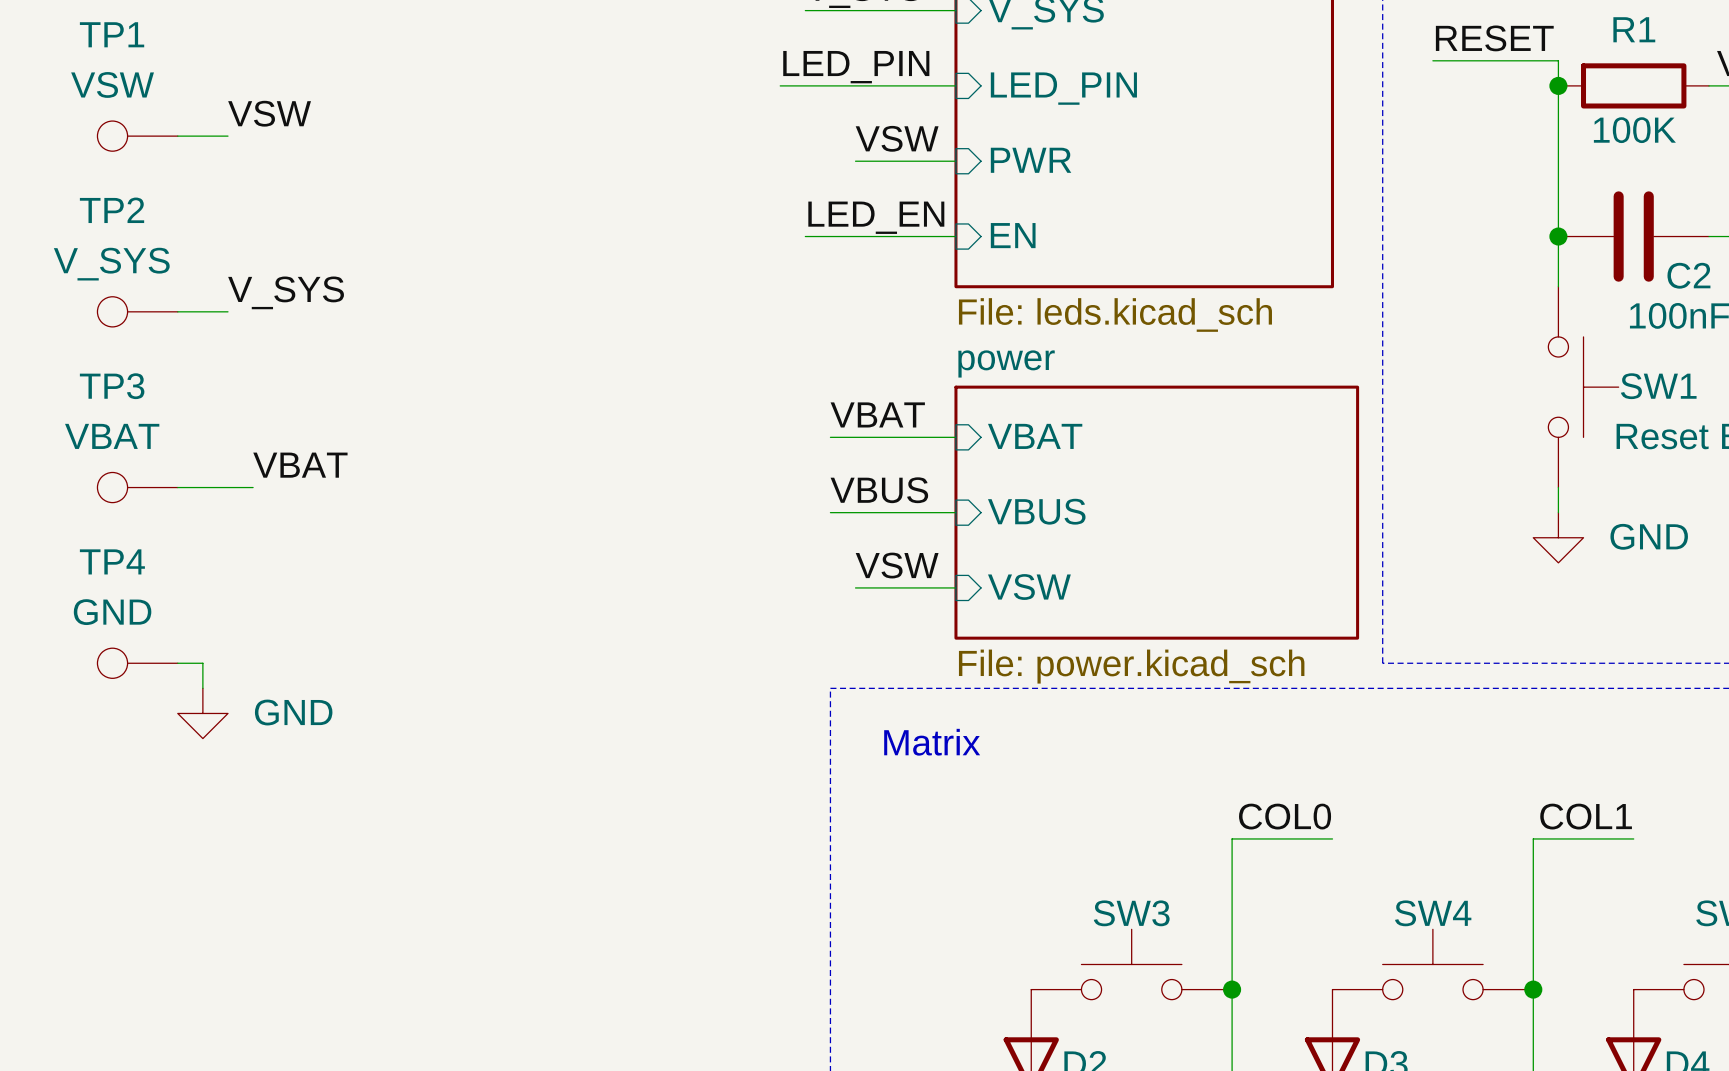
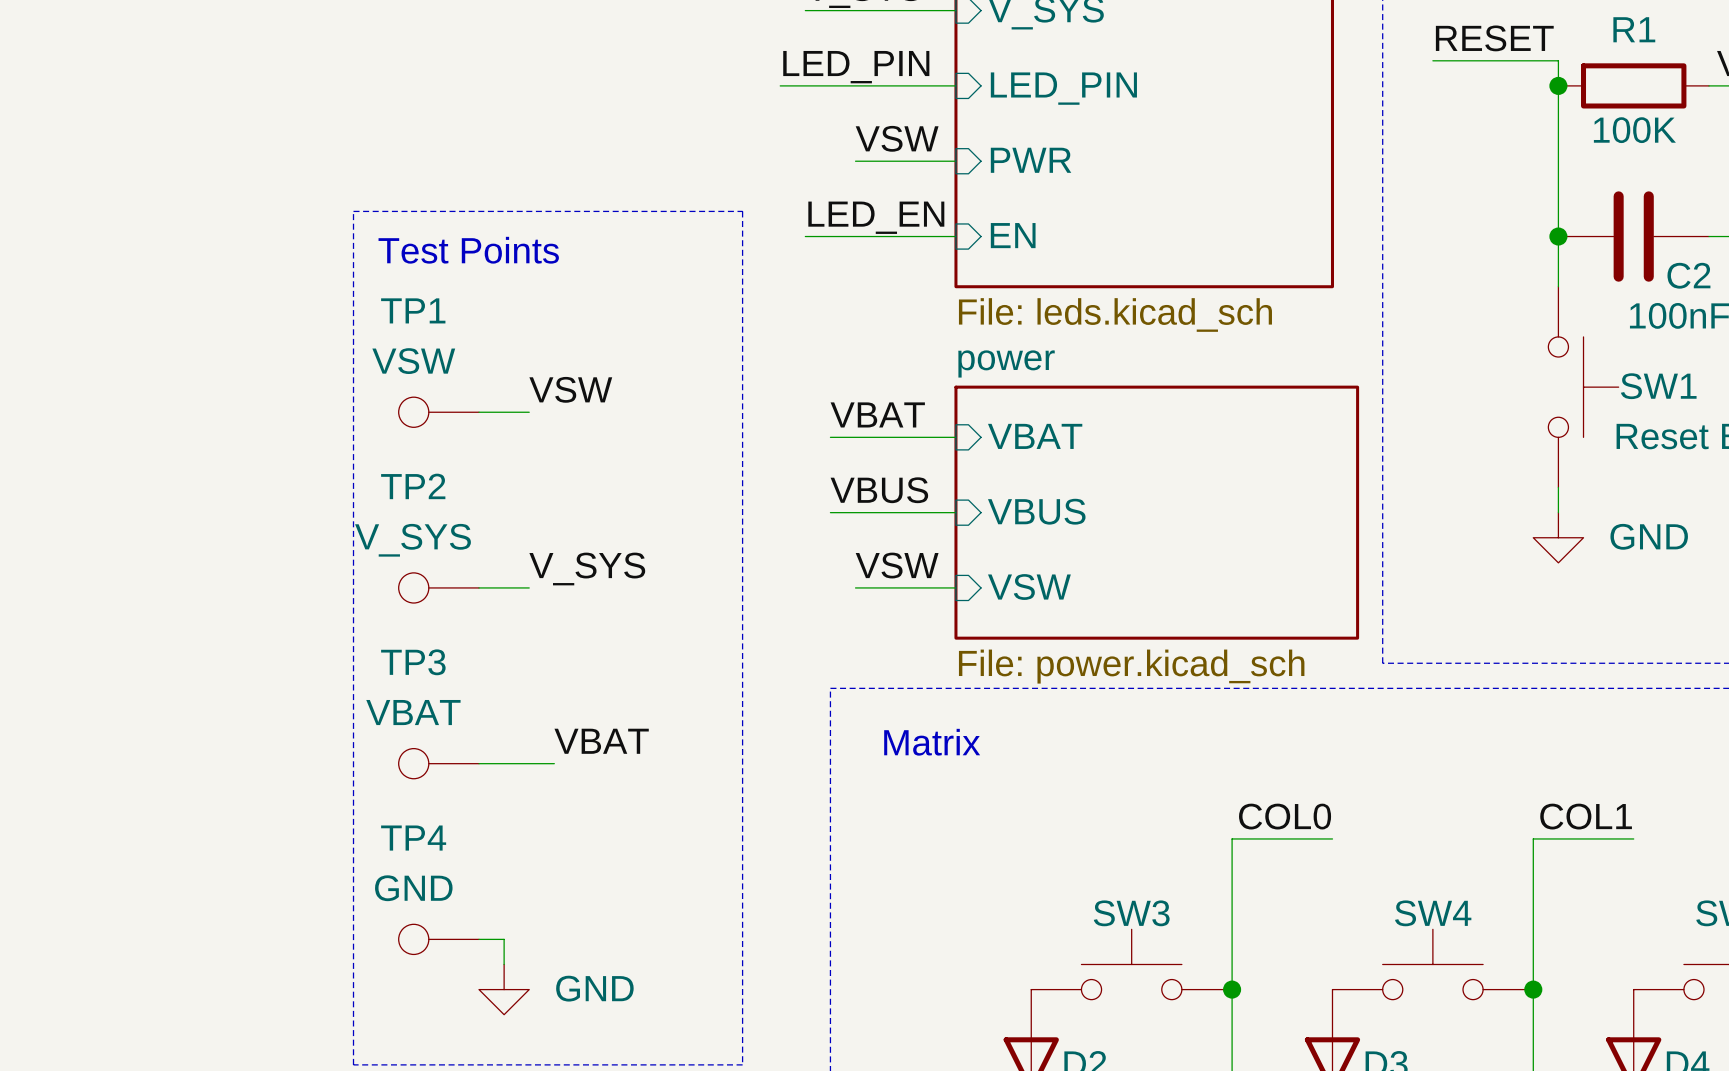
label position: VSW (269, 113) -> VSW (570, 389)
TP1 position: (137, 136) -> (438, 412)
wire: (177, 136) (227, 136) -> (479, 412) (529, 412)
line: none -> (353, 211) (742, 211) (742, 1064) (353, 1064) (353, 211)
text: none -> Test Points (468, 250)
label position: V_SYS (286, 292) -> V_SYS (587, 568)
TP2 position: (137, 311) -> (438, 587)
wire: (177, 311) (227, 311) -> (479, 587) (529, 587)
label position: VBAT (300, 465) -> VBAT (601, 741)
TP3 position: (137, 487) -> (438, 763)
wire: (177, 487) (253, 487) -> (479, 763) (554, 763)
TP4 position: (137, 663) -> (438, 939)
wire: (177, 663) (202, 663) (202, 688) -> (479, 939) (504, 939) (504, 964)
power symbol position: GND (202, 713) -> GND (504, 989)

